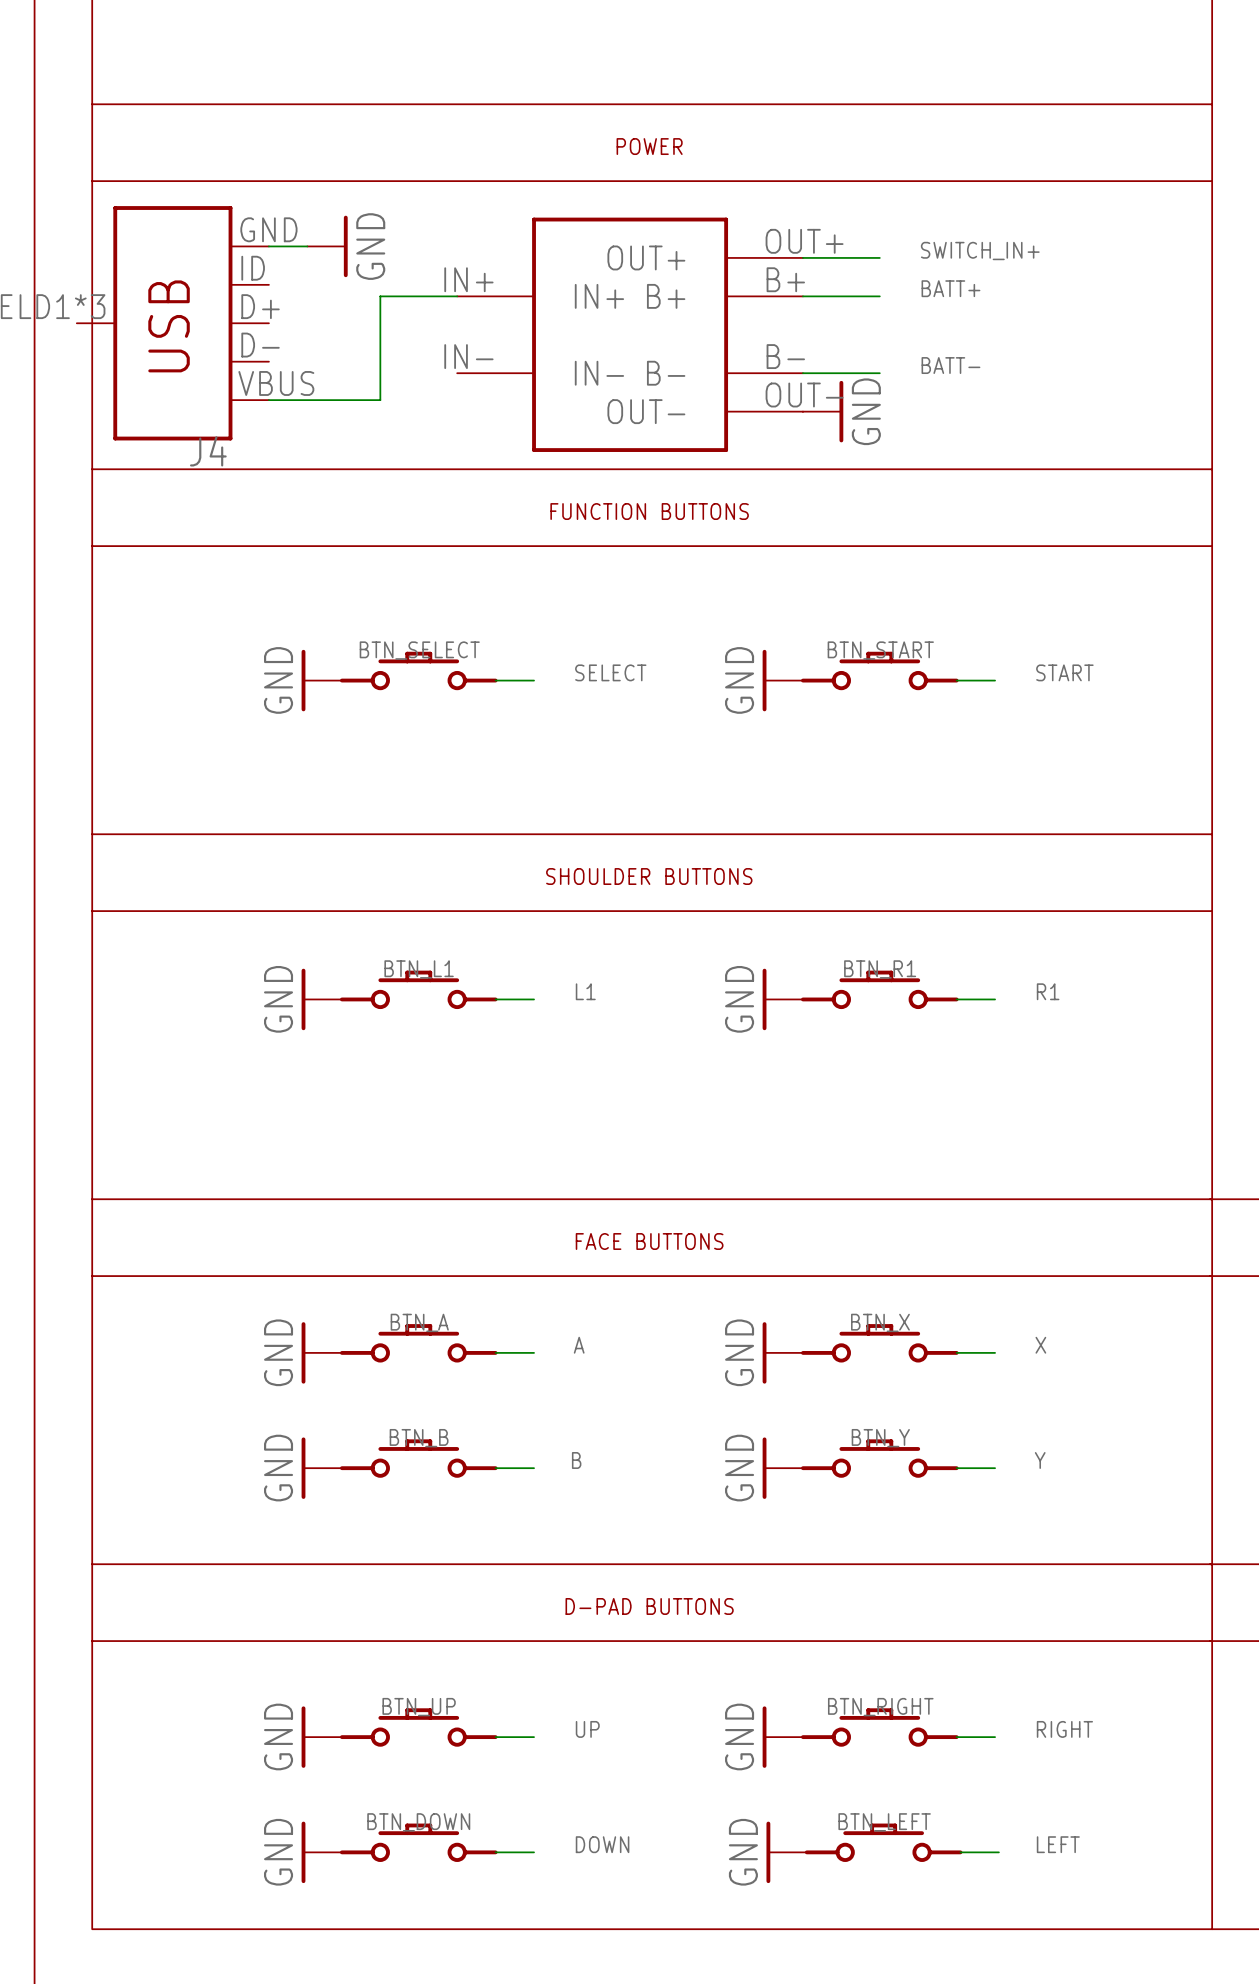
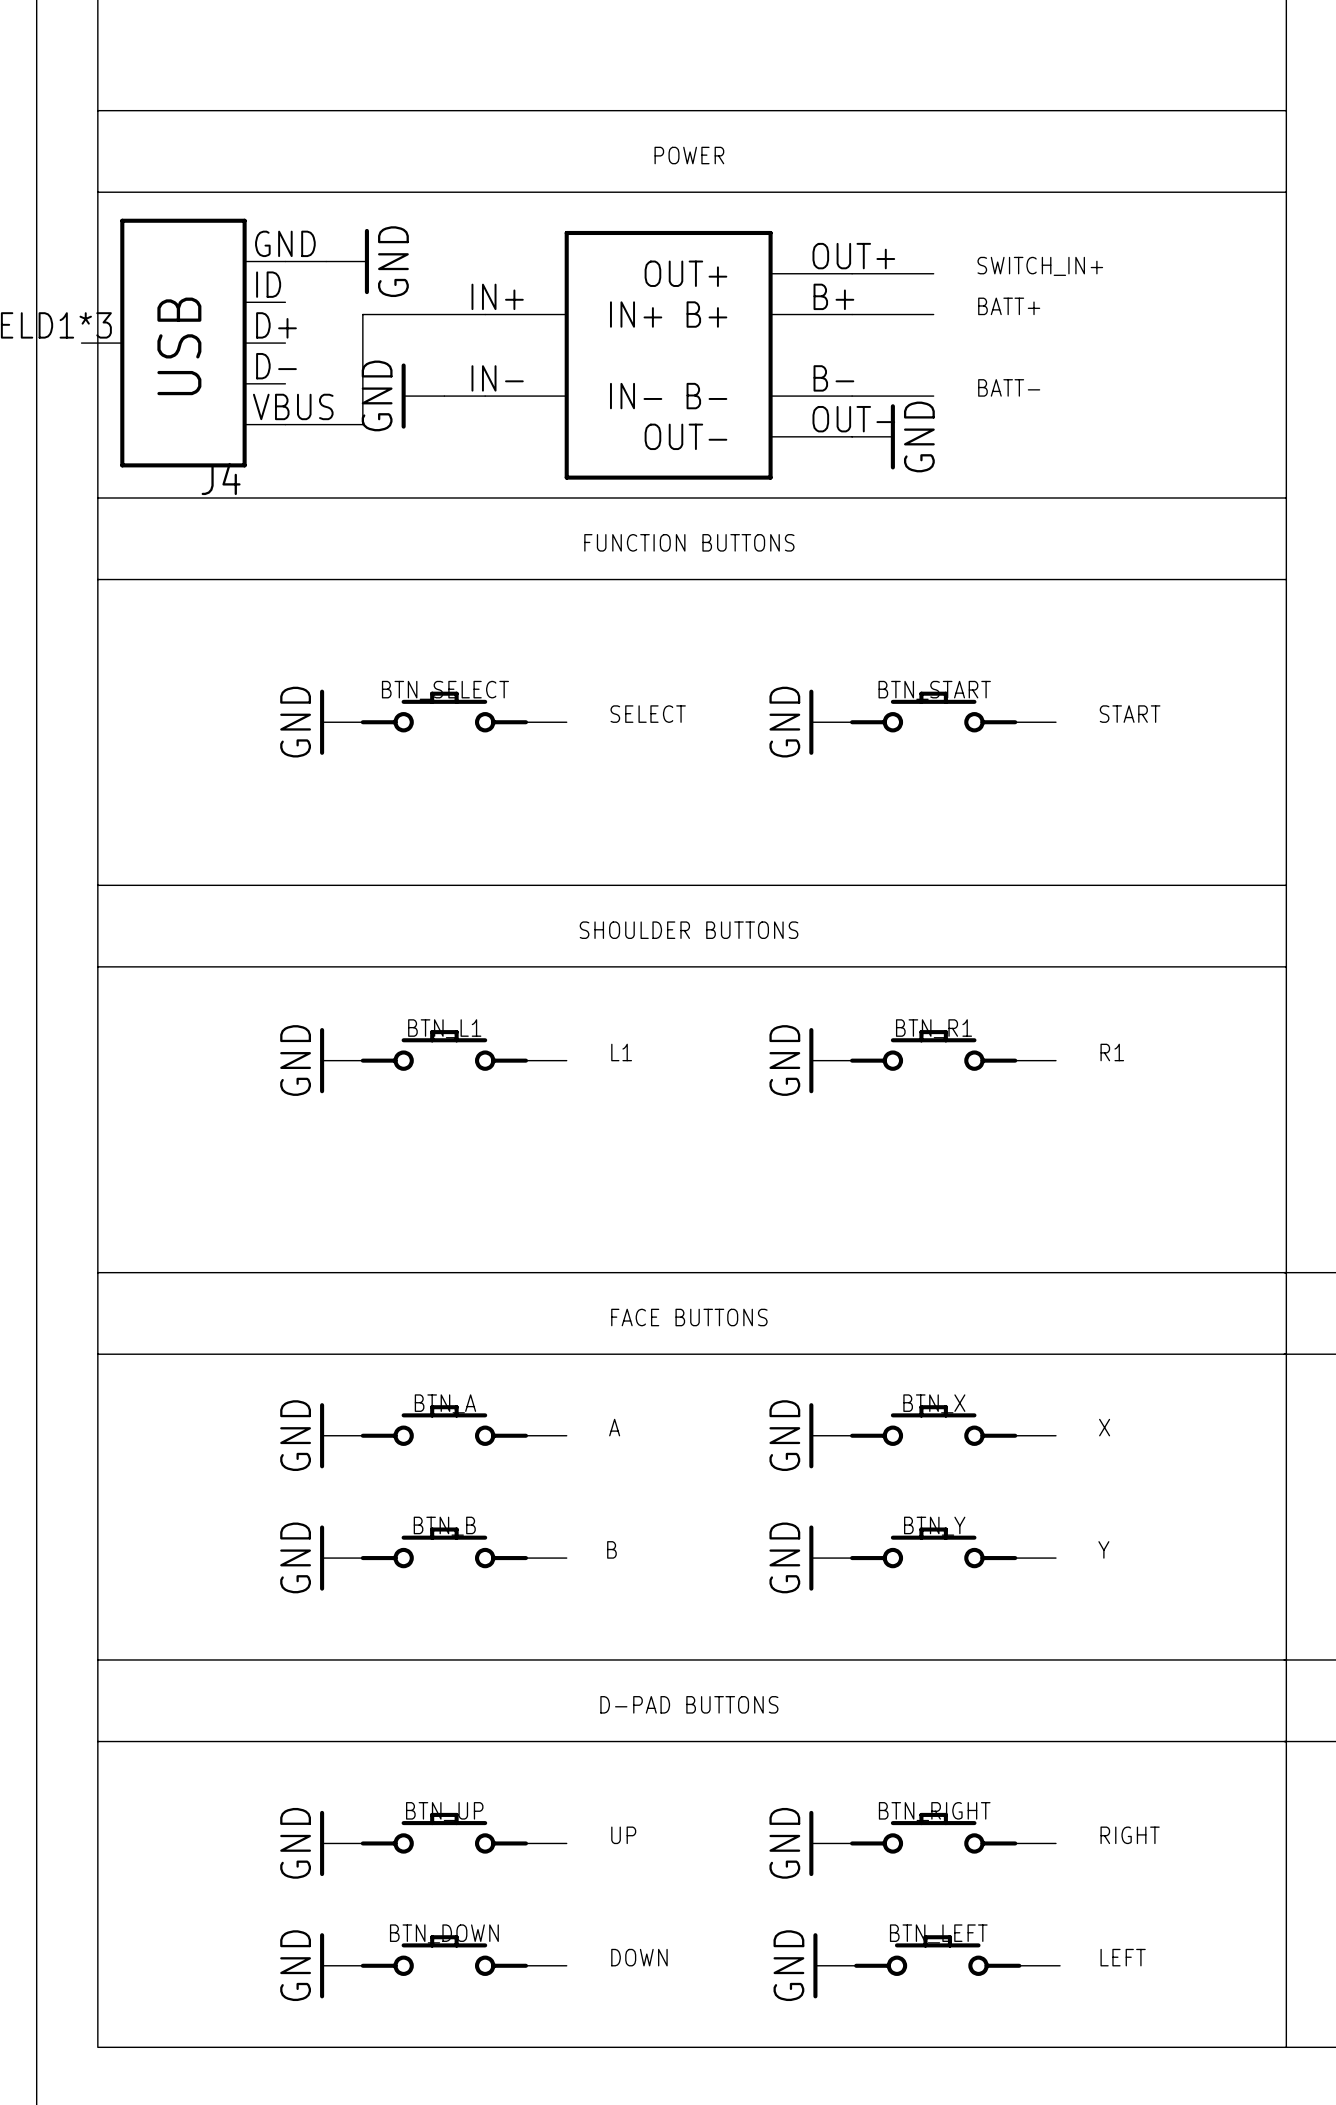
wire: (380, 296) (380, 400) (341, 400) -> (403, 314) (362, 314) (362, 424)
power symbol: none -> GND (423, 396)
wire: none -> (444, 396) (485, 396)

